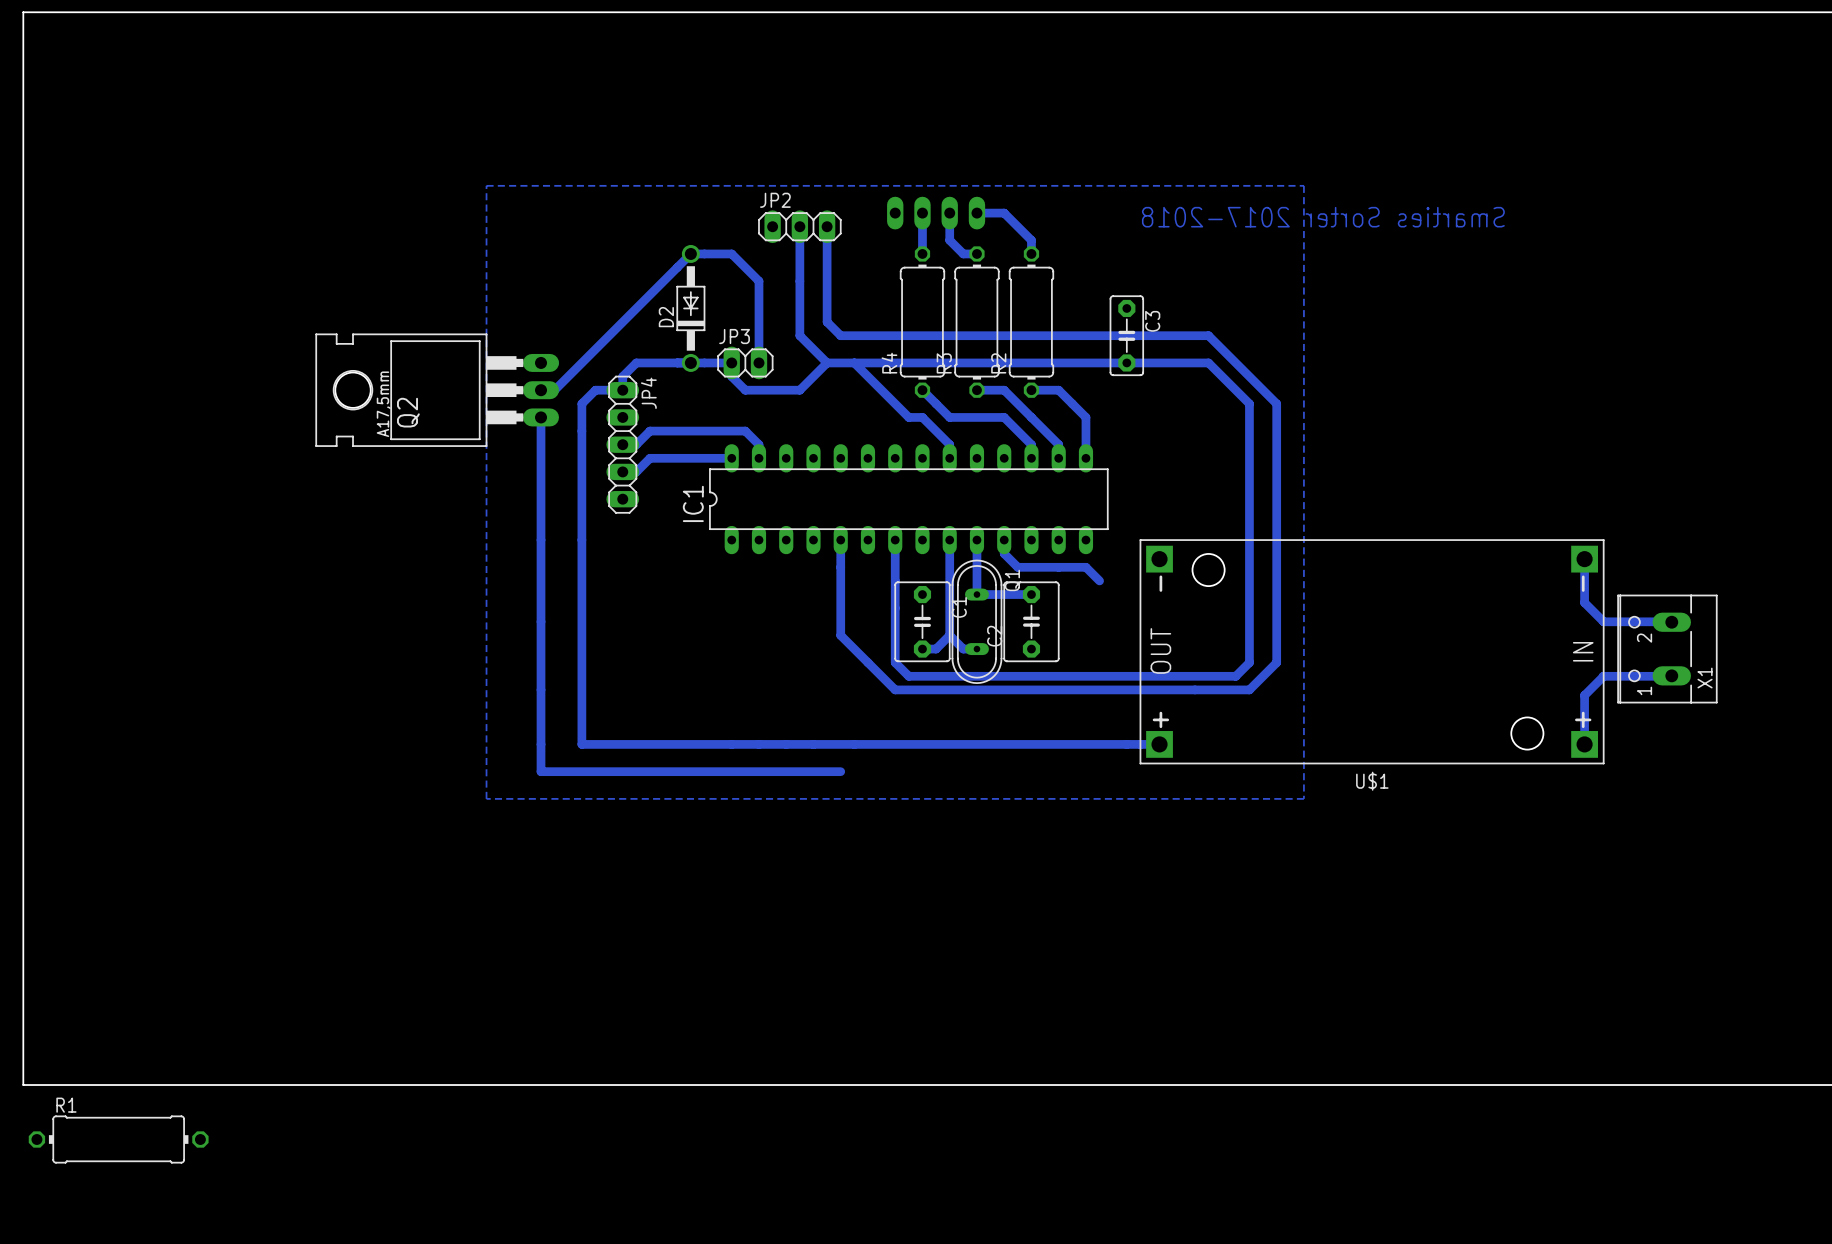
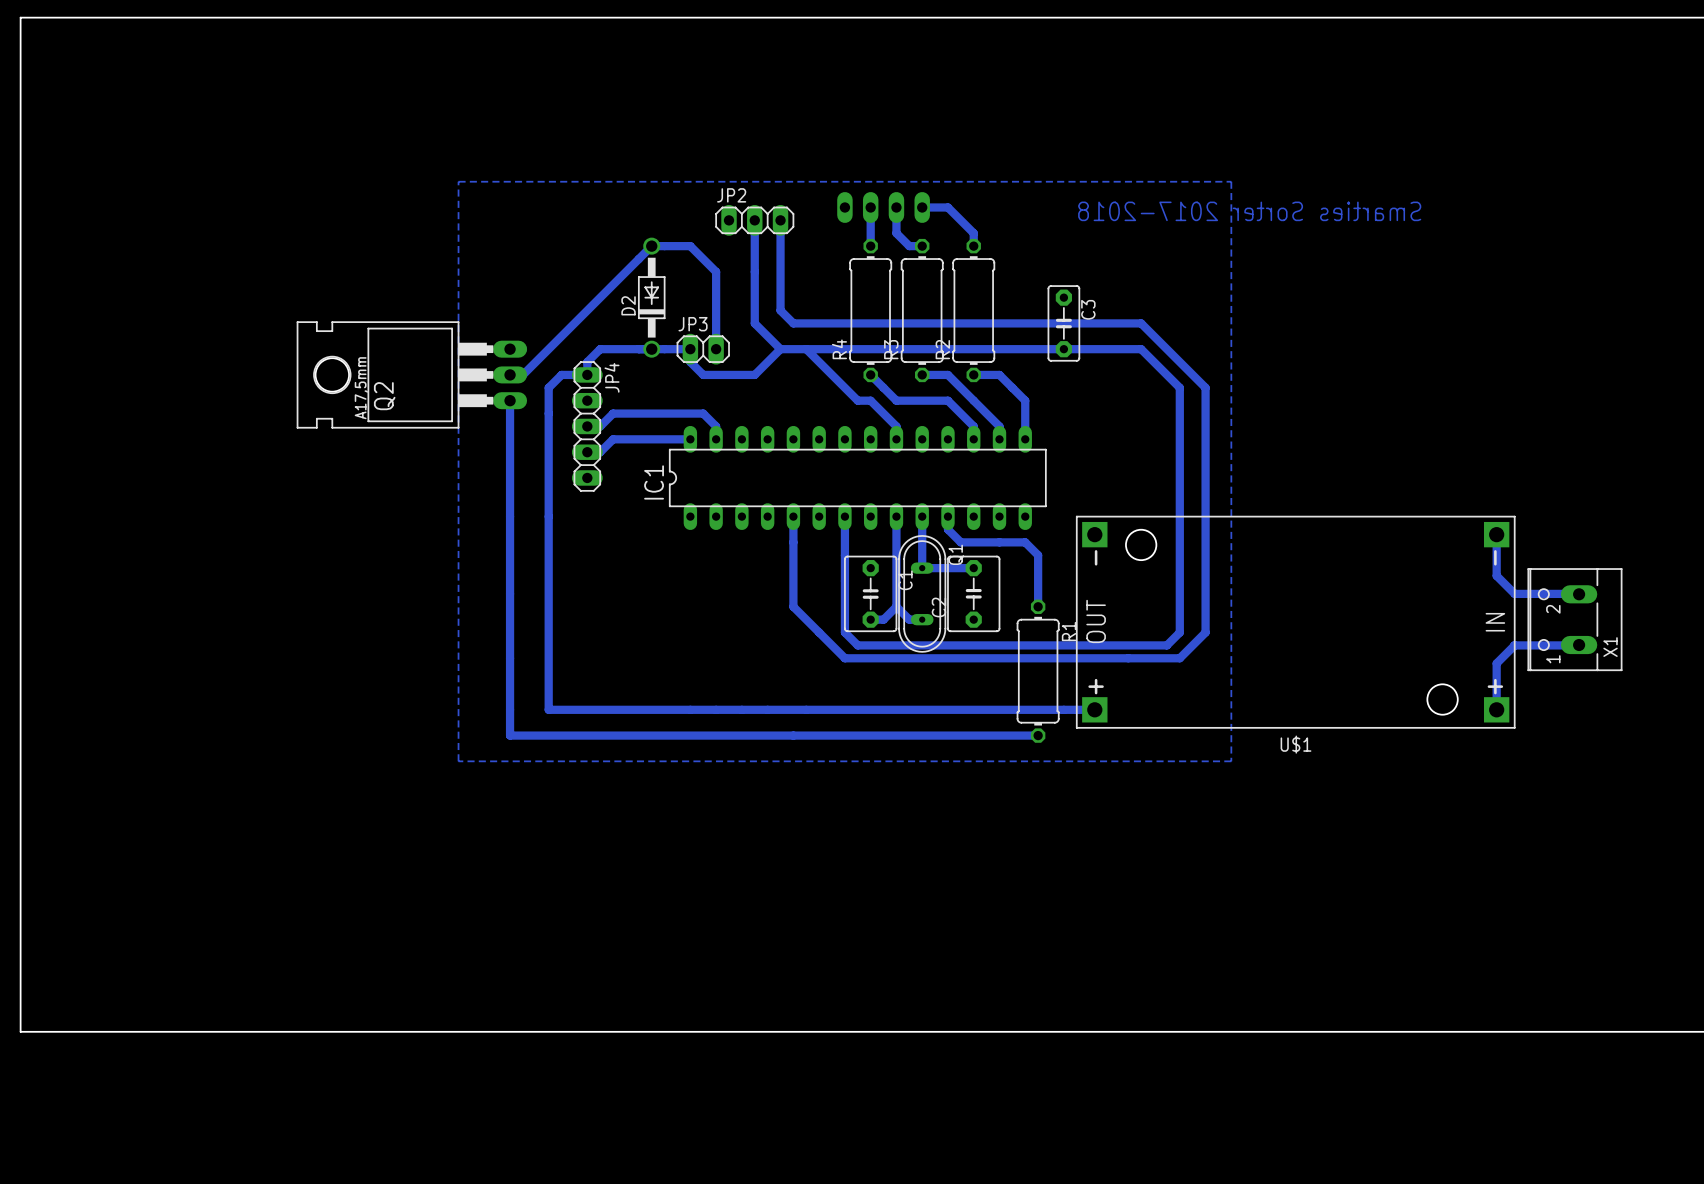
bottom track: none -> (1038, 555) (1038, 606)
bottom track: none -> (793, 735) (1038, 735)
R1 name position: R1 (66, 1105) -> R1 (1069, 631)
R1 footprint: [28, 1115, 209, 1164] -> [1016, 599, 1060, 743]

